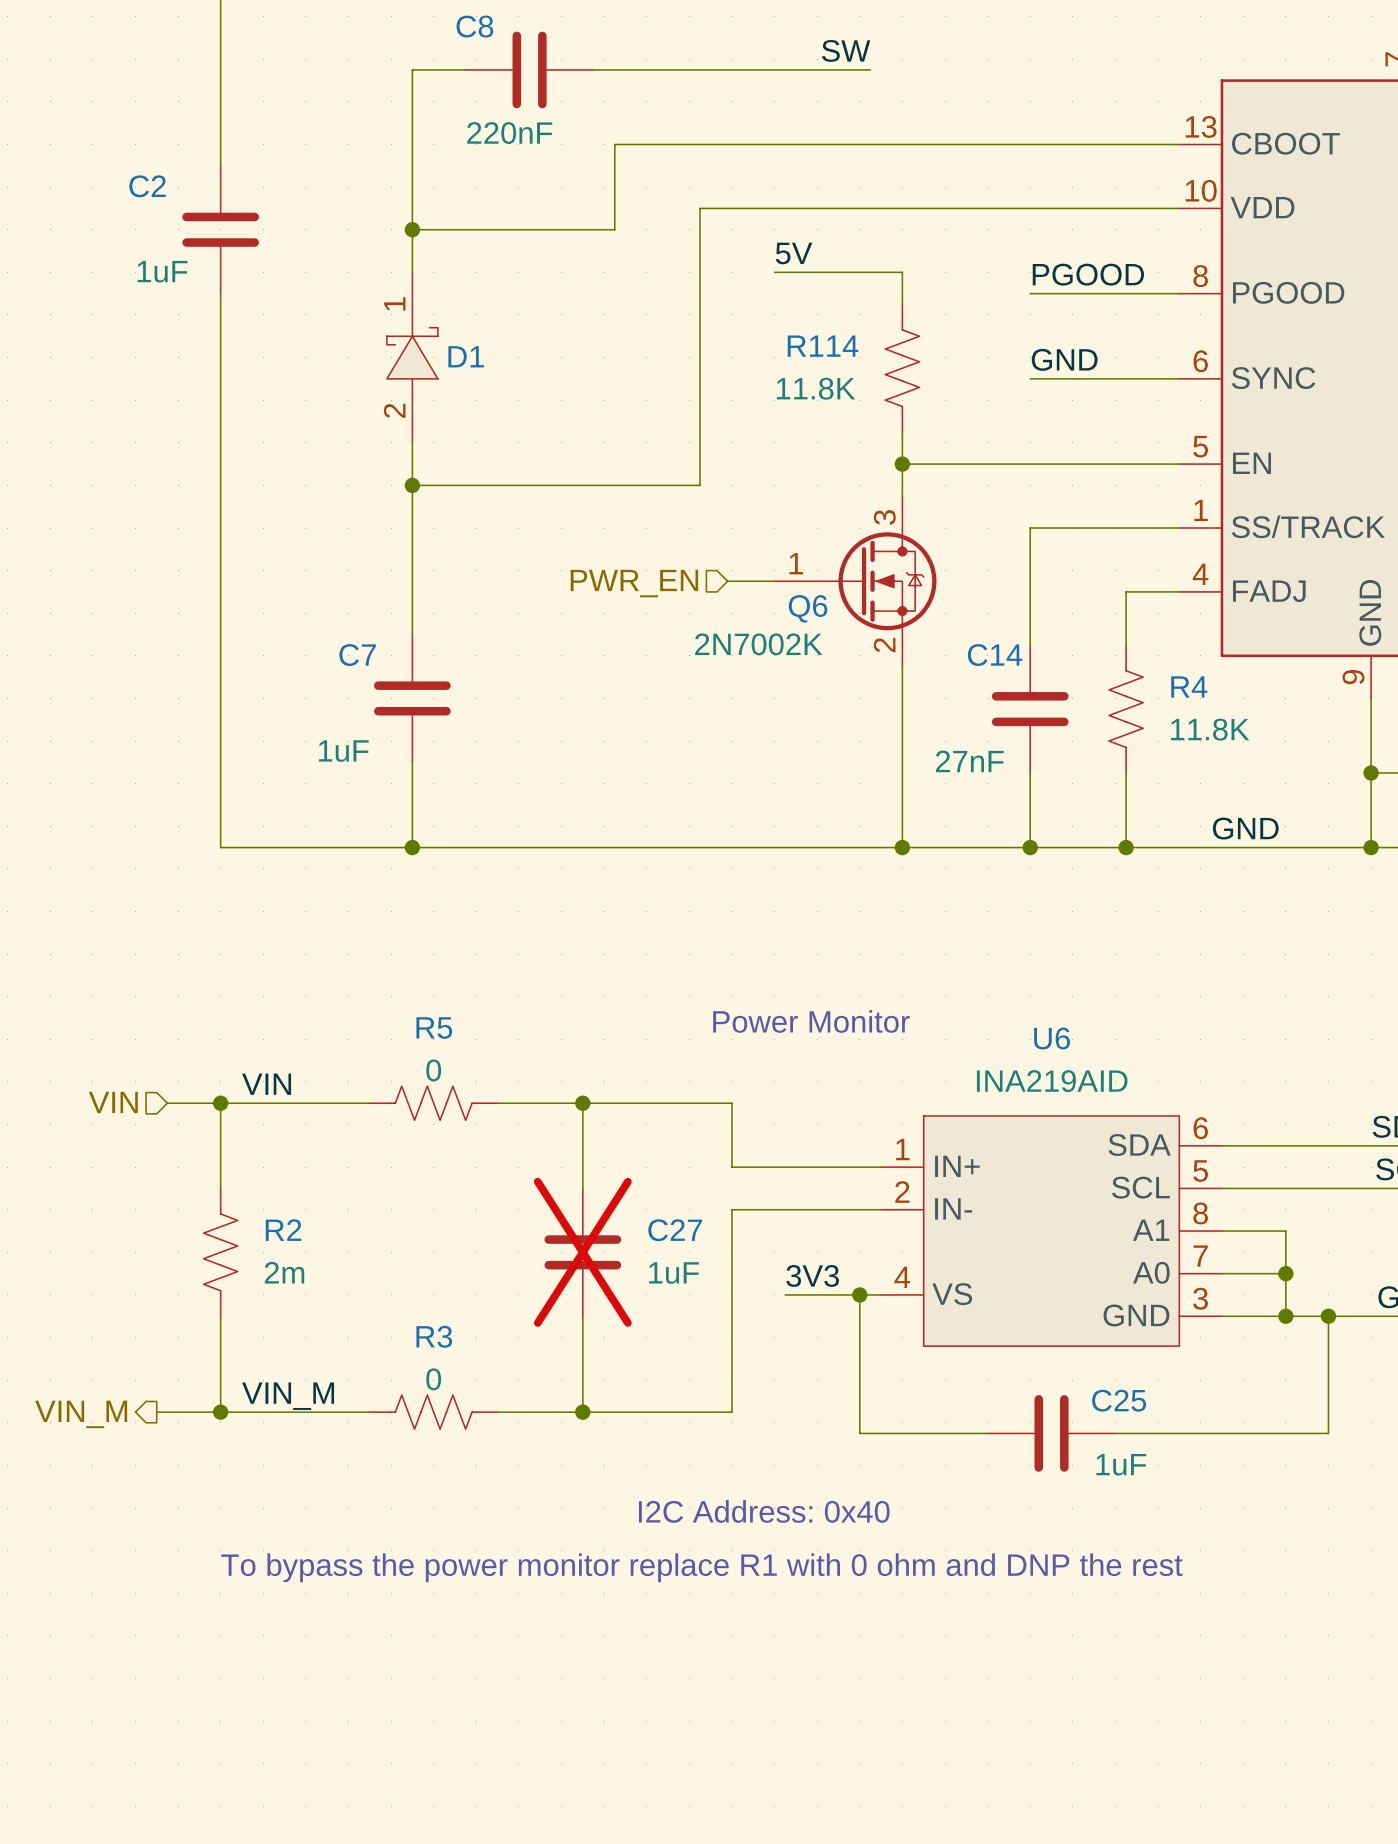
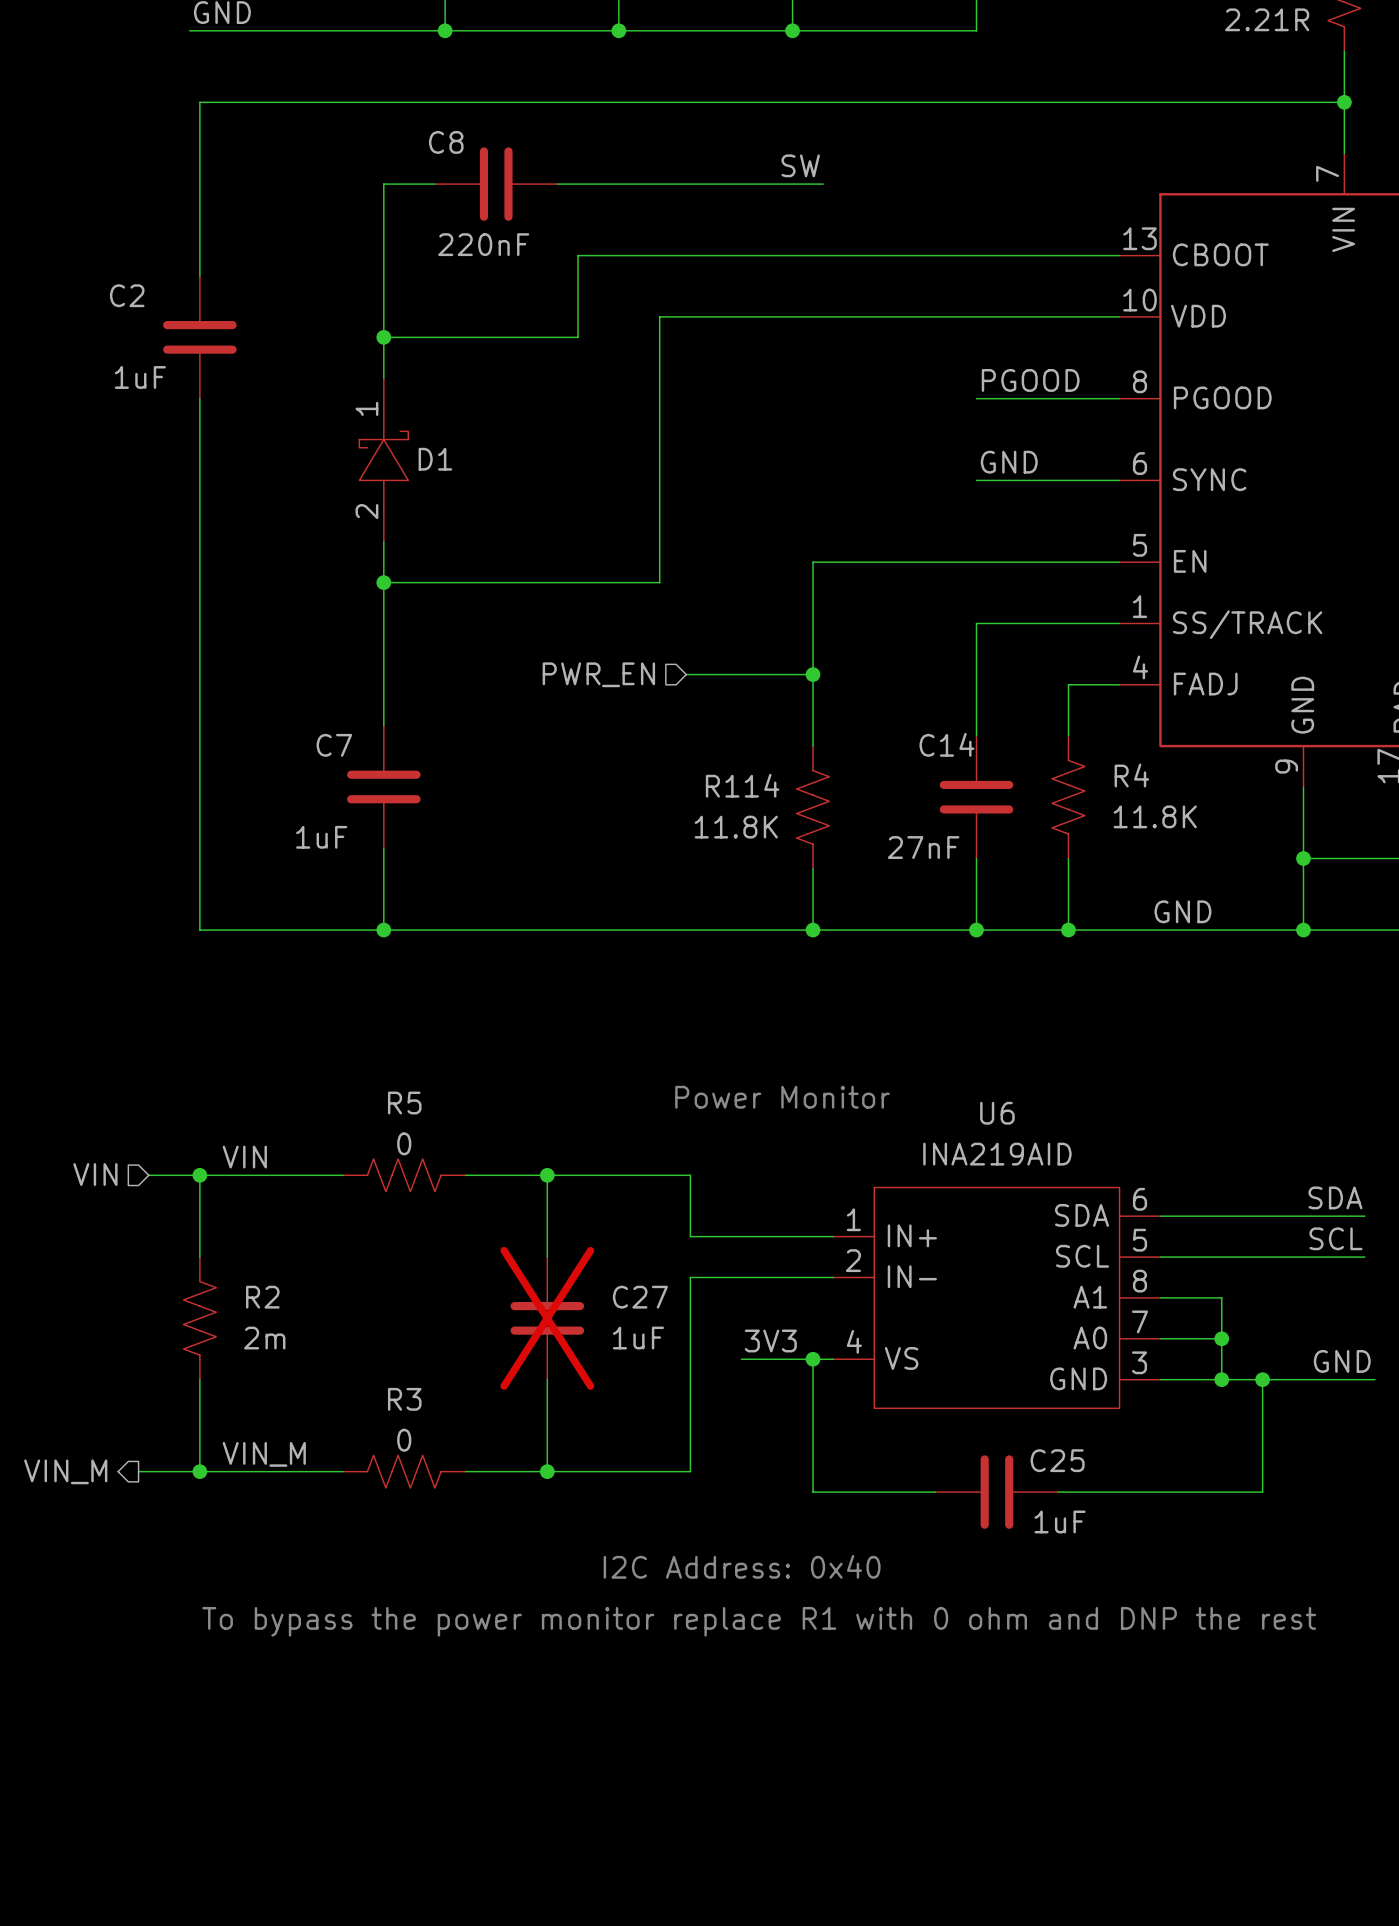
label: 5V (794, 253) -> none
wire: (774, 272) (902, 272) (902, 304) -> none
R114 position: (902, 368) -> (813, 807)
wire: (902, 432) (902, 496) -> (813, 868) (813, 930)
wire: none -> (853, 562) (813, 562) (813, 746)
junction: (902, 464) -> none
Q6: 2N7002K (855, 581) -> none
junction: none -> (813, 674)
wire: (902, 666) (902, 847) -> none
junction position: (902, 847) -> (813, 930)

